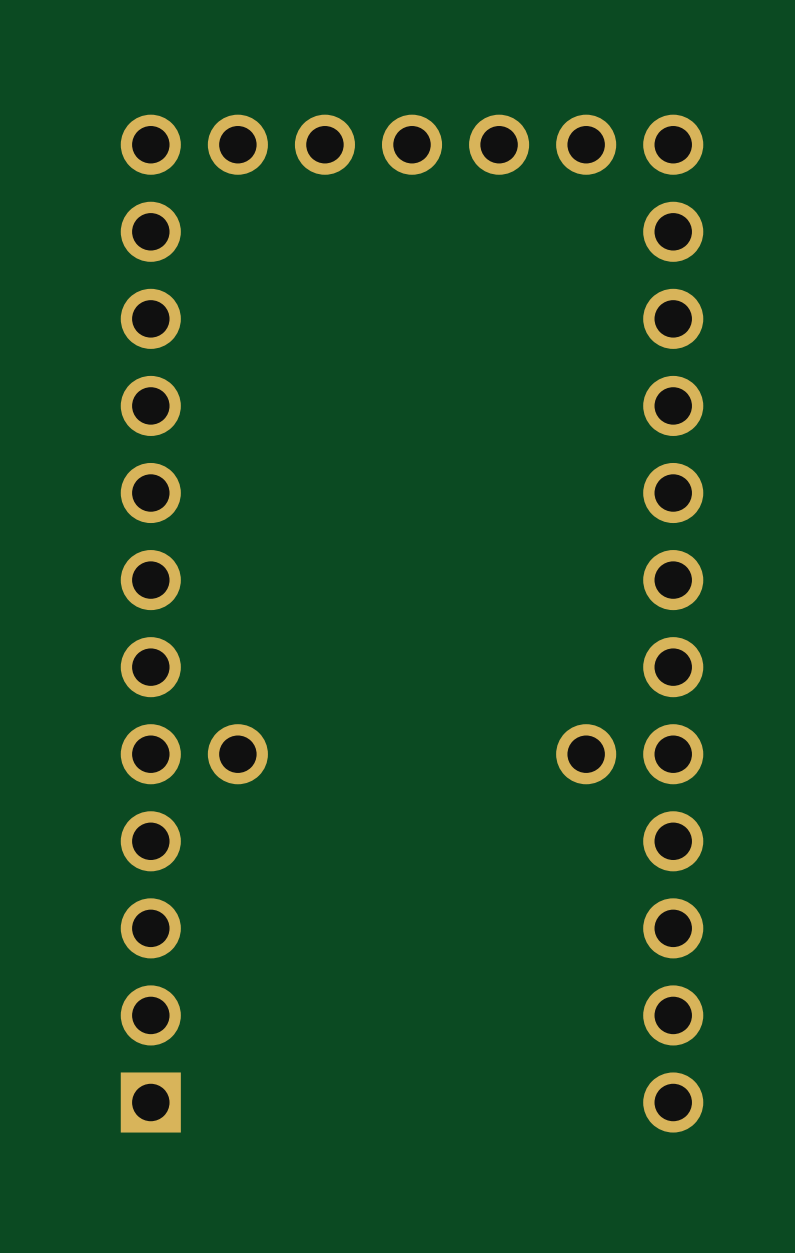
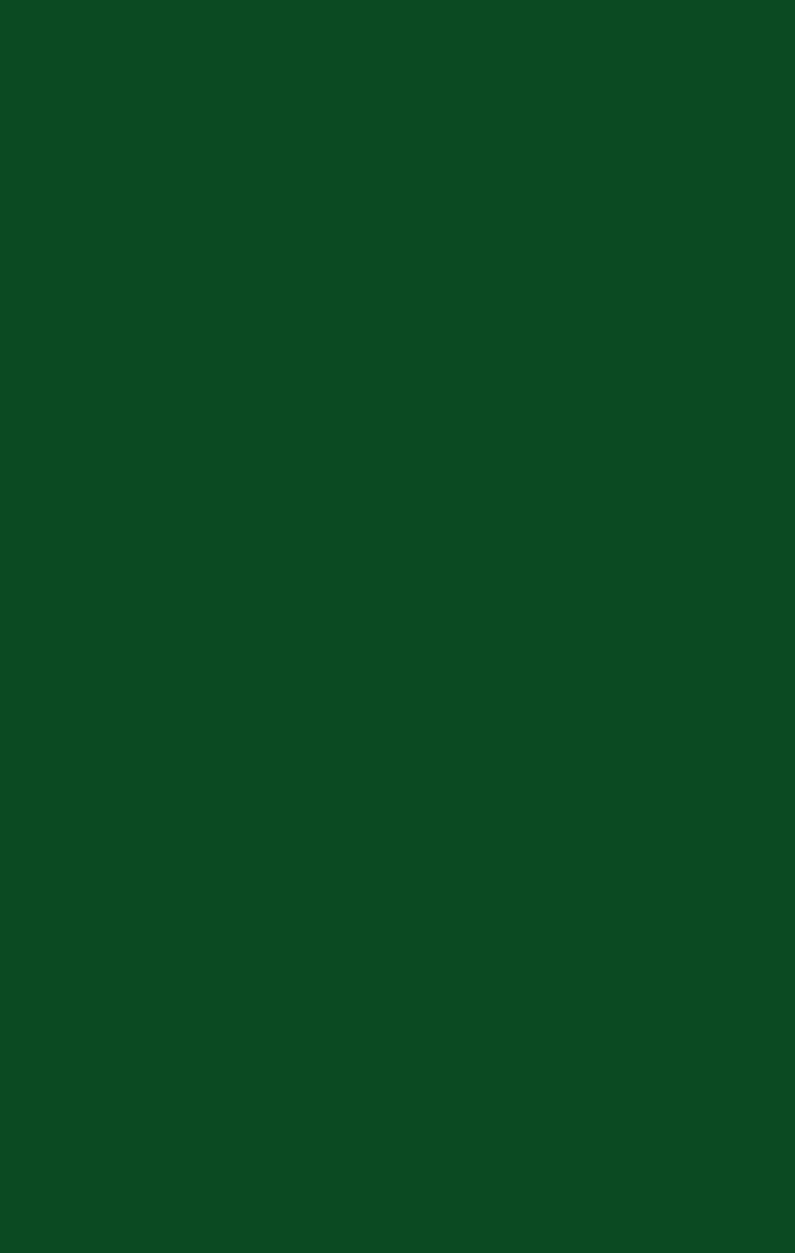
part: (412, 623) -> none

